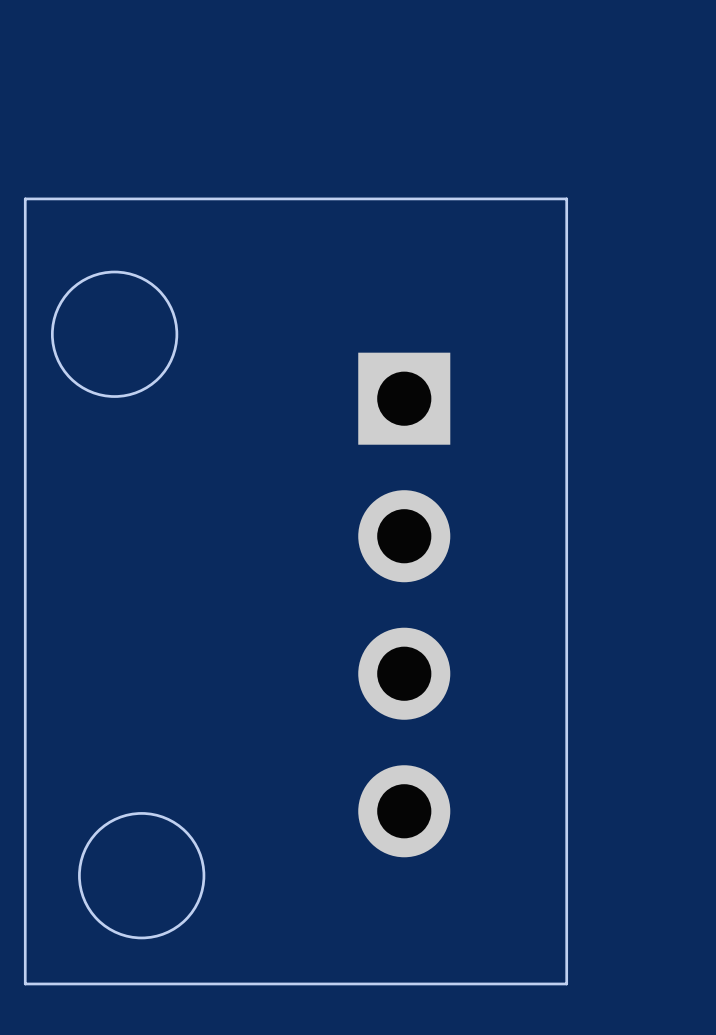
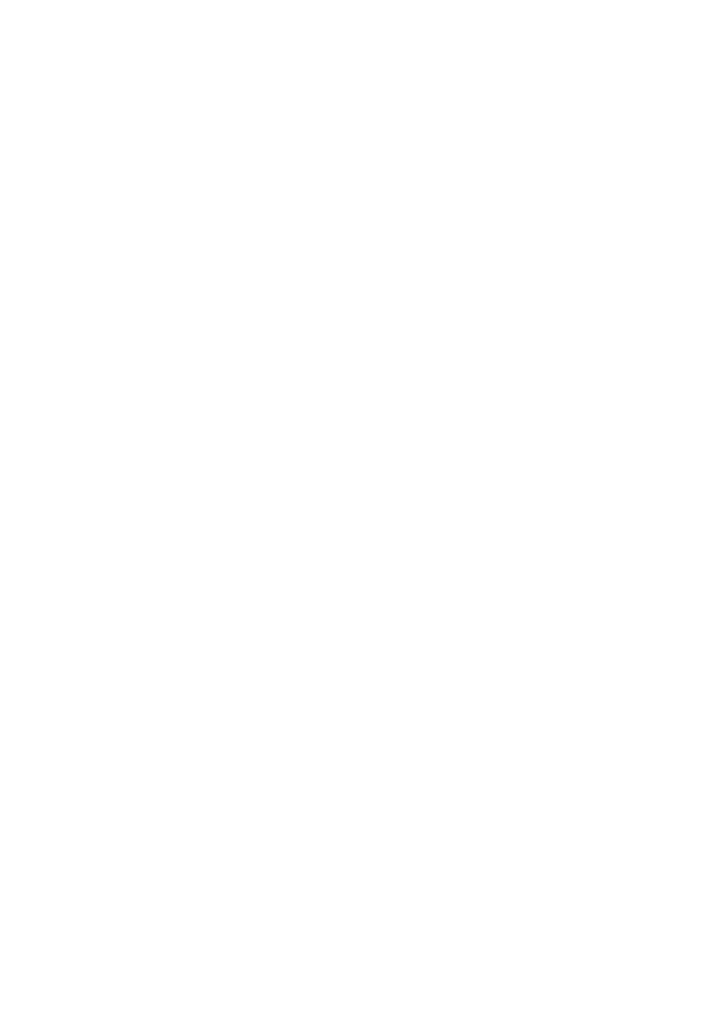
board edge: (566, 198) (25, 198) (25, 983) (566, 983) (566, 198) -> none
round board edge: [50, 270, 179, 398] -> none
part: (404, 604) -> none
round board edge: [78, 812, 206, 940] -> none

